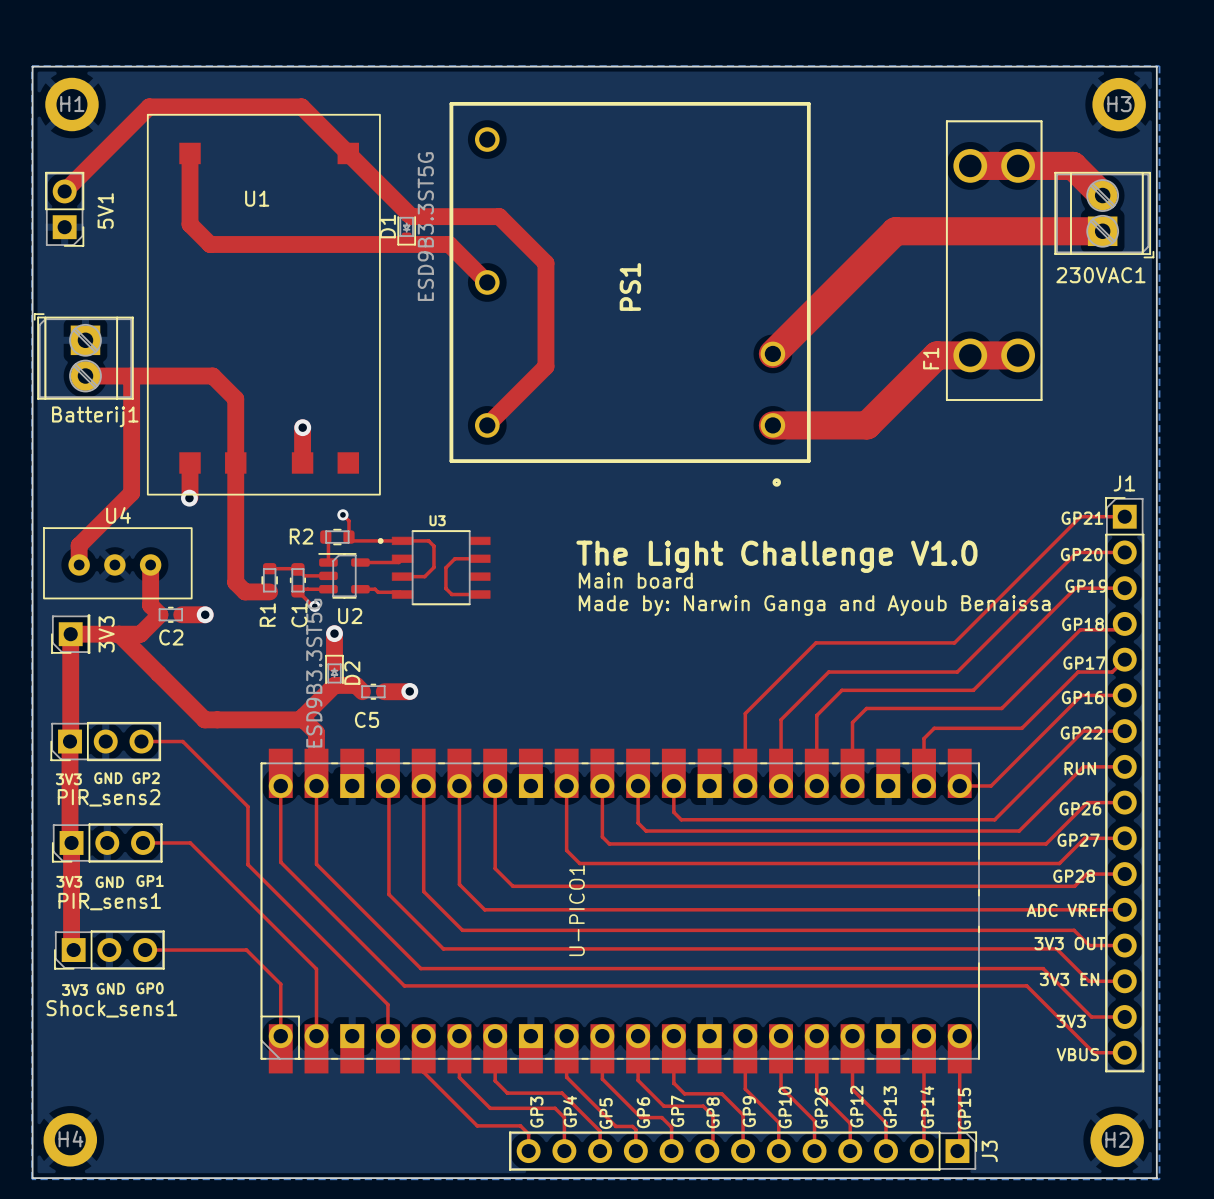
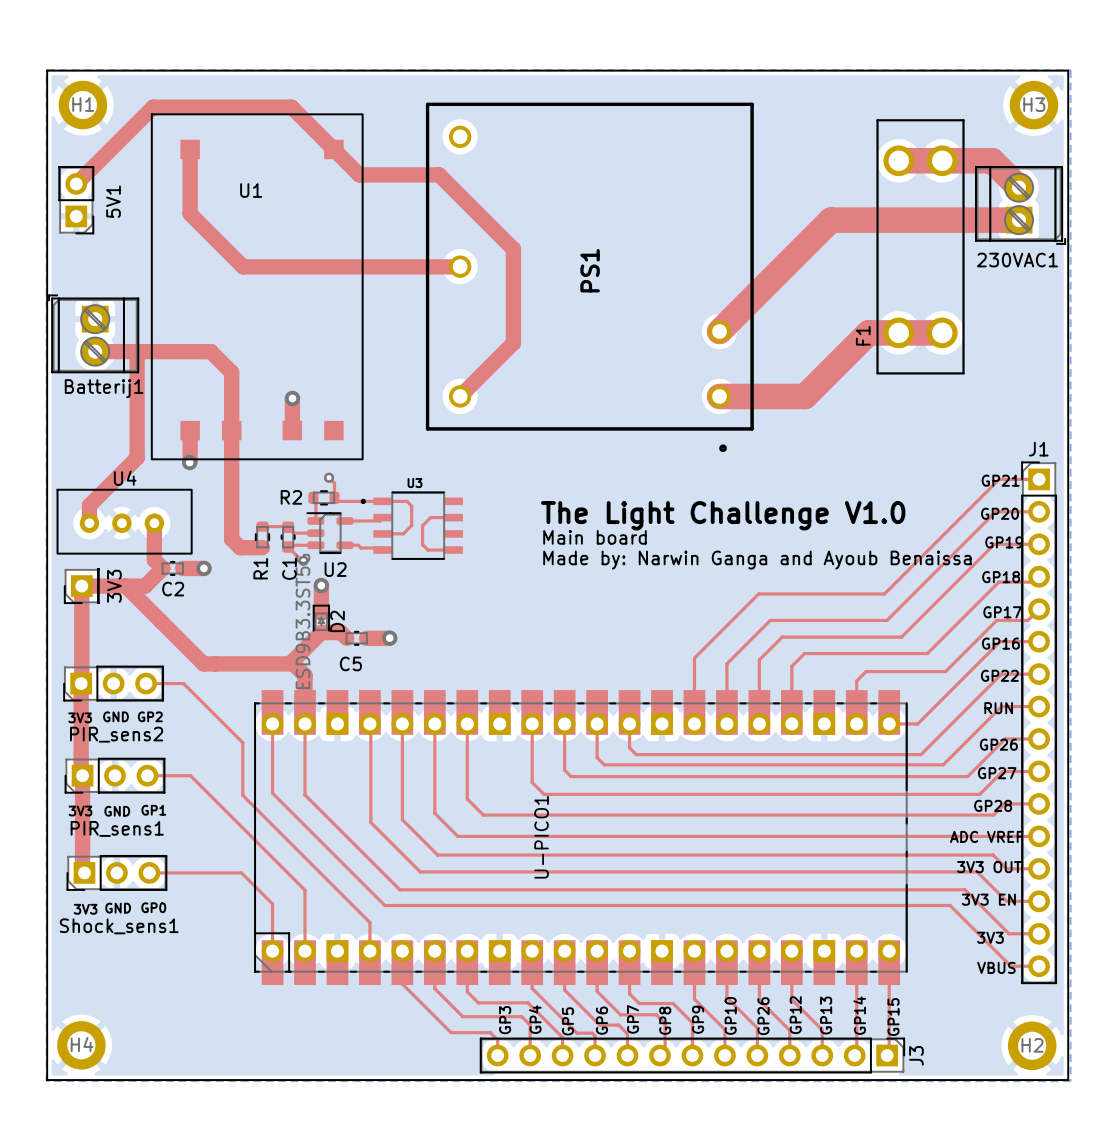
top track: (376, 181) (411, 216) (499, 216) -> (359, 174) (439, 174) (471, 206)
D1: ESD9B3.3ST5G (406, 229) -> none
top track: (210, 244) (449, 244) (487, 282) -> (208, 232) (243, 266) (460, 266)

